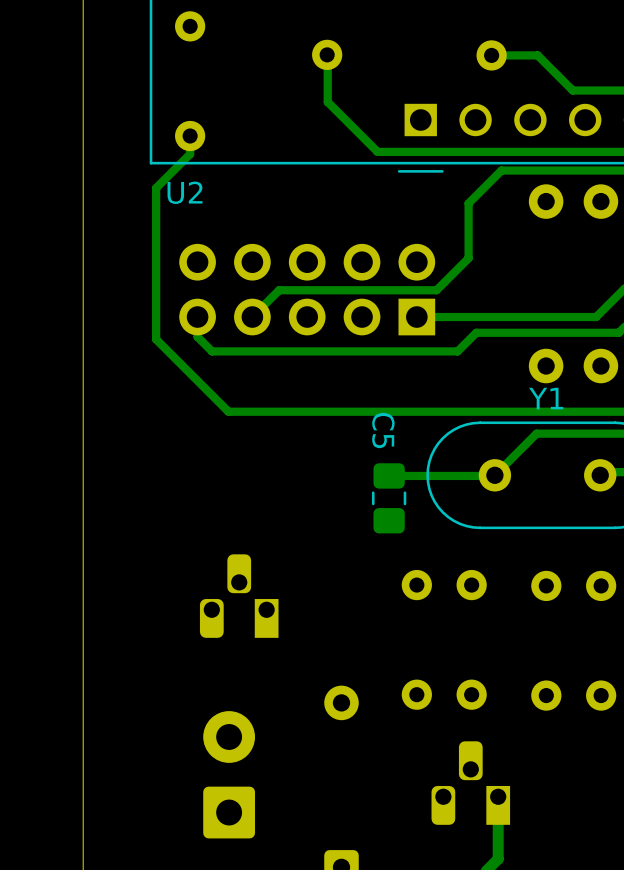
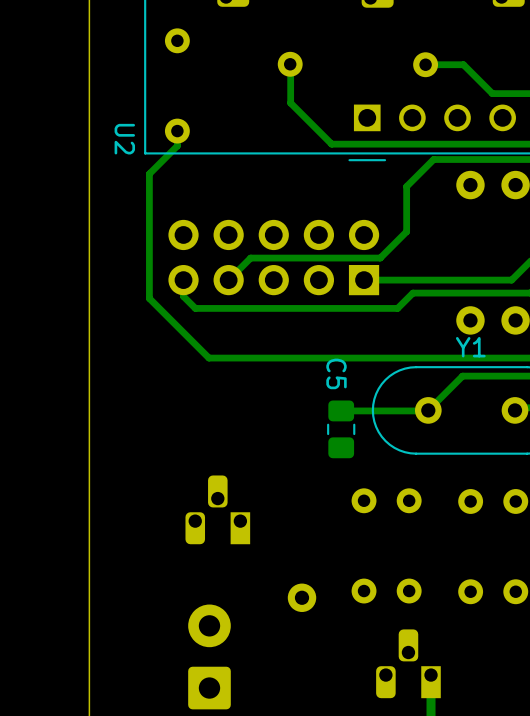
U2 name rotation: 0° (185, 192) -> 90° clockwise (124, 139)
U2 name position: U2 (185, 192) -> U2 (124, 139)

